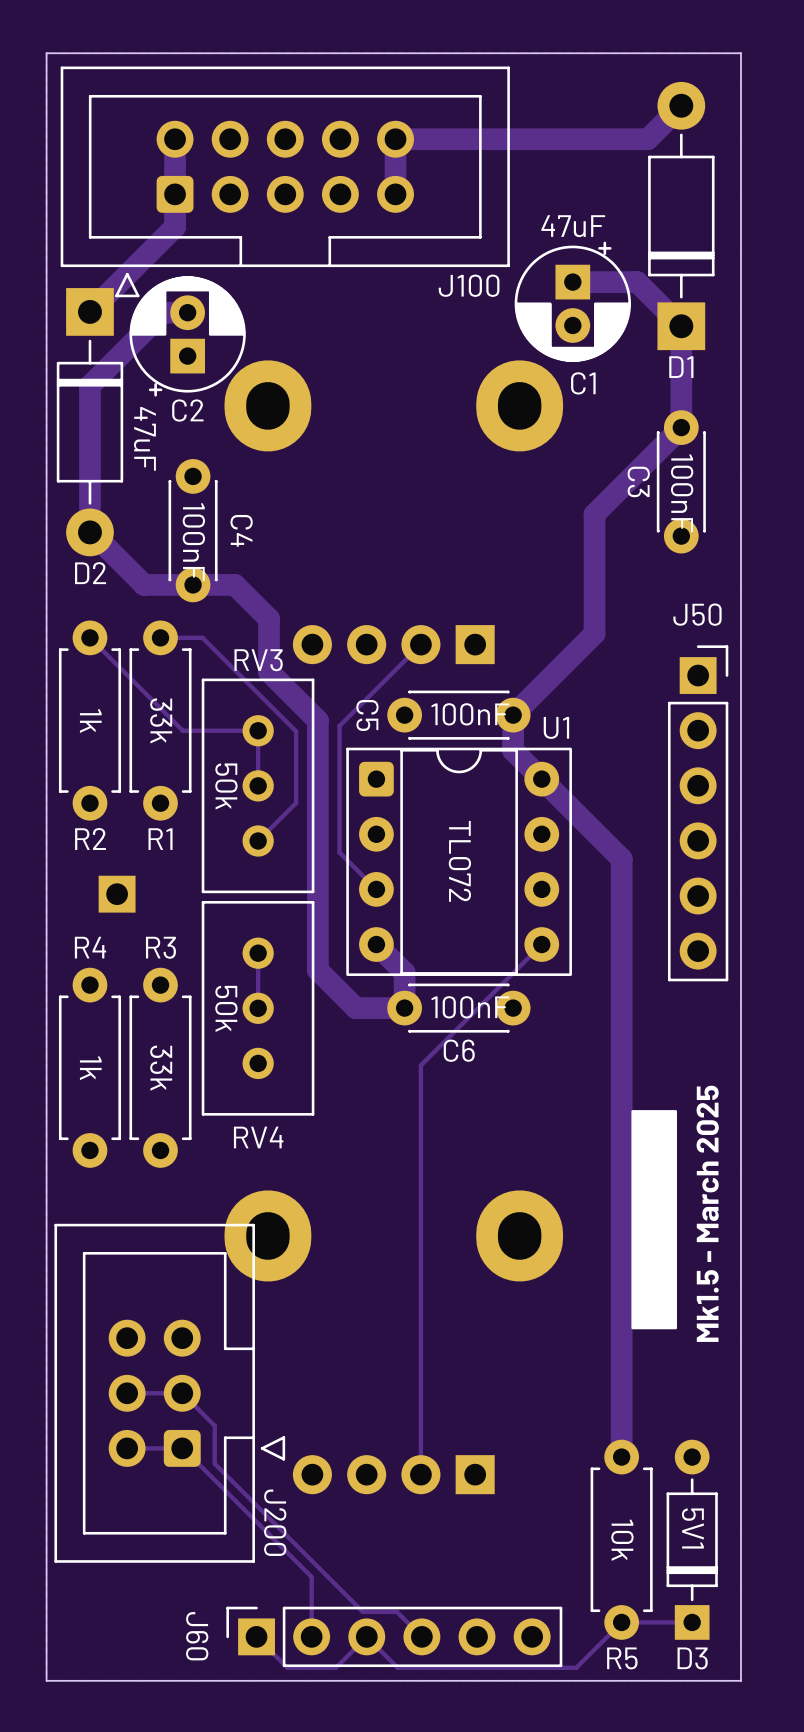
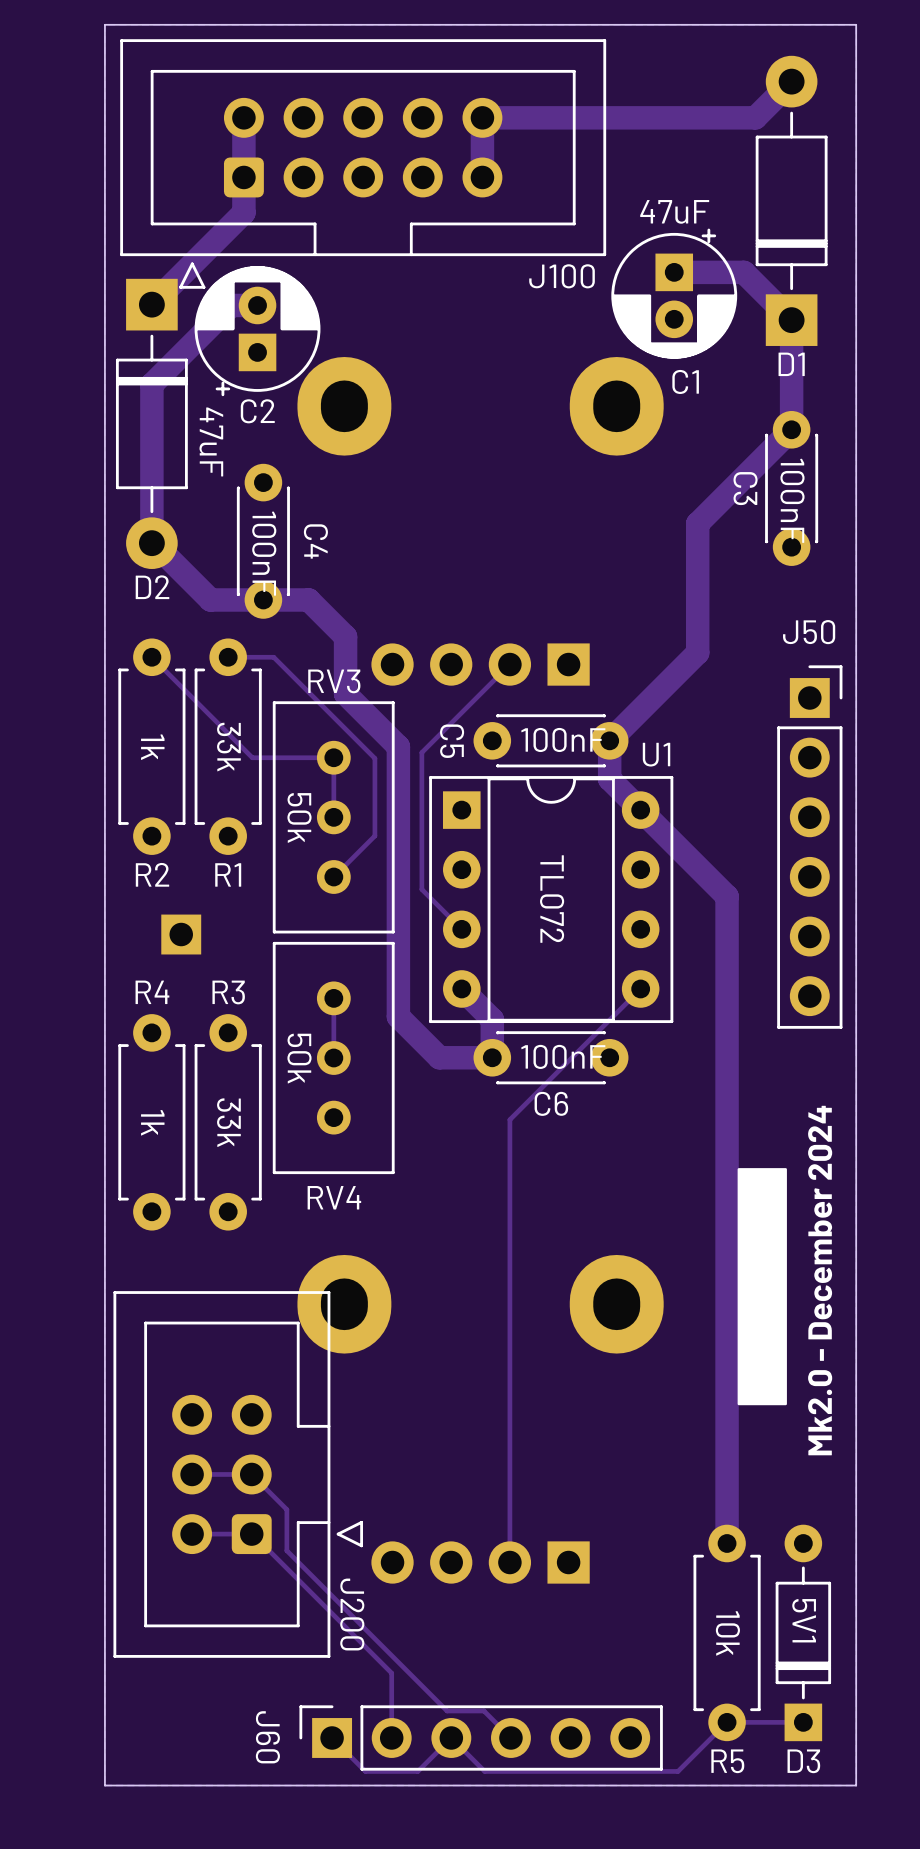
U1 footprint: [346, 747, 572, 976] -> [429, 776, 674, 1024]
text: Mk1.5 - March 2025 (707, 1213) -> Mk2.0 - December 2024 (820, 1280)

